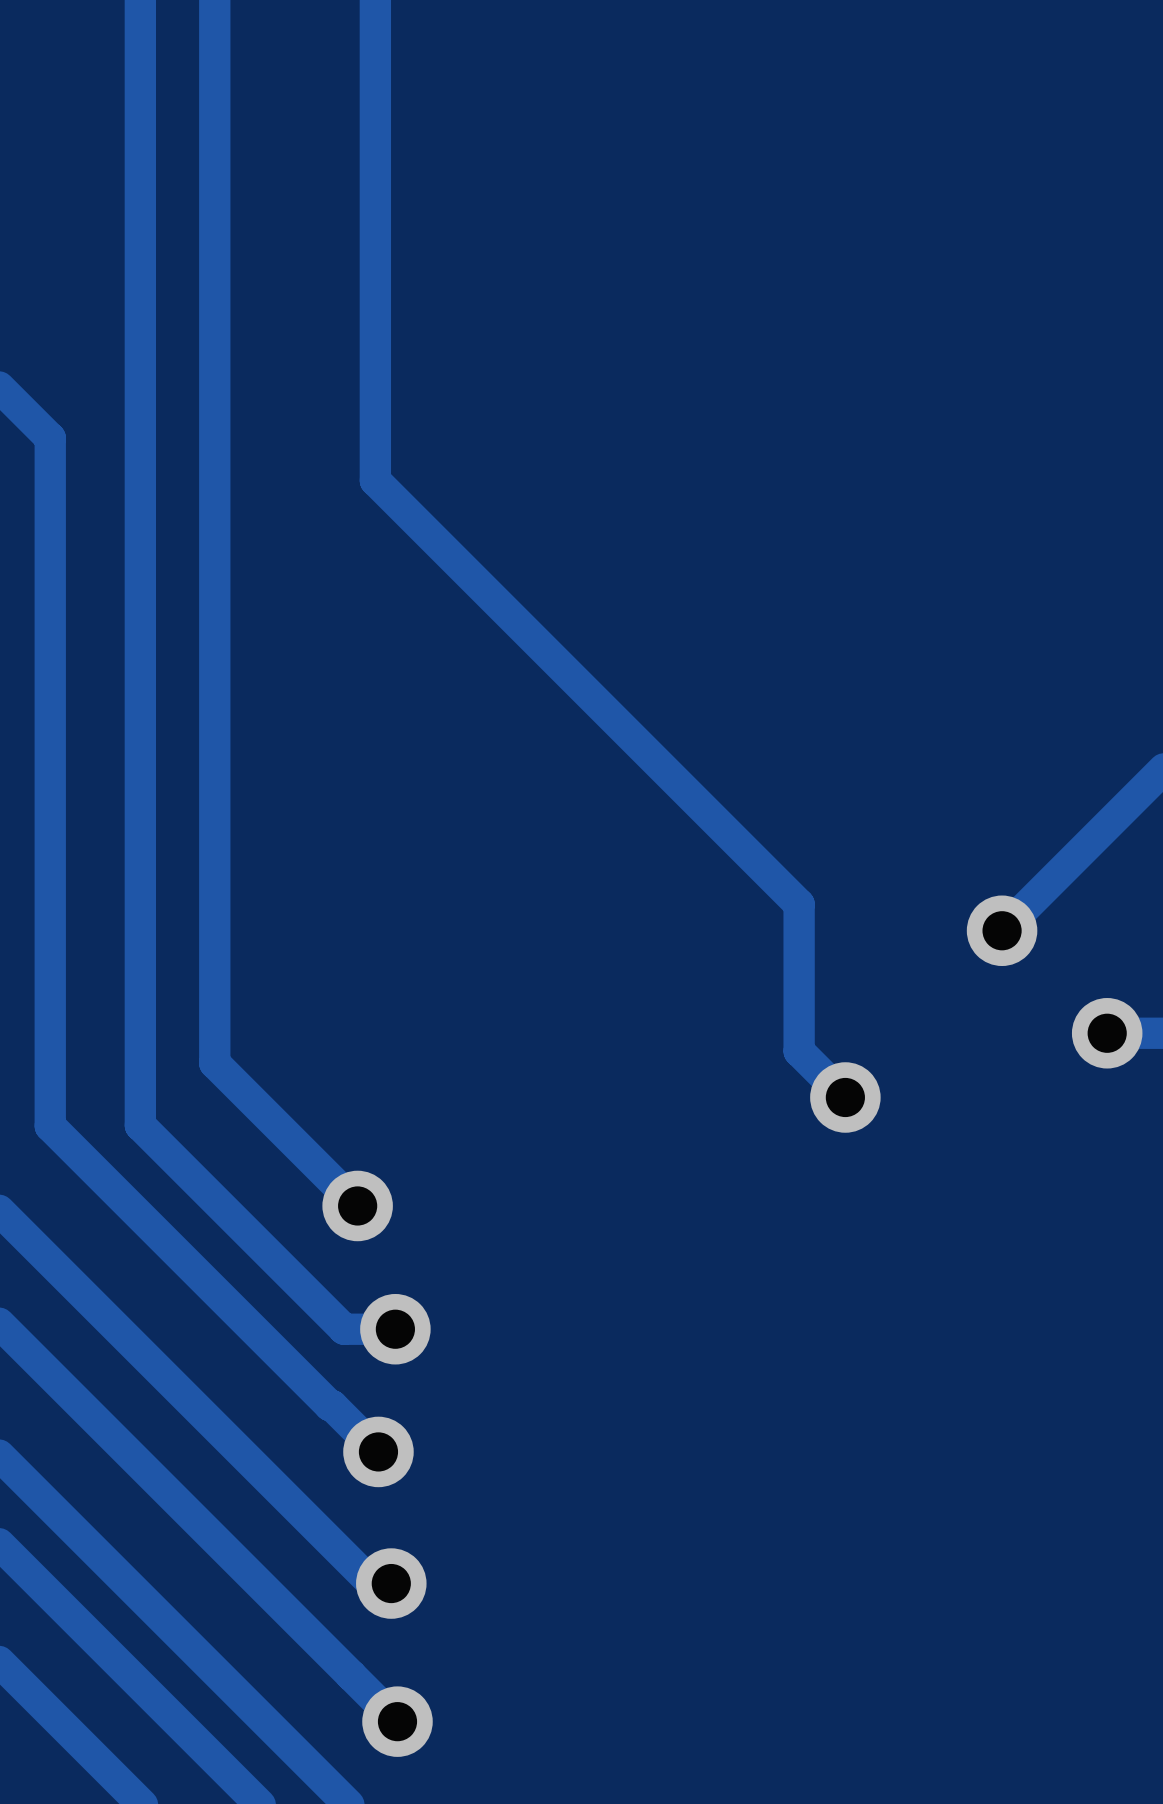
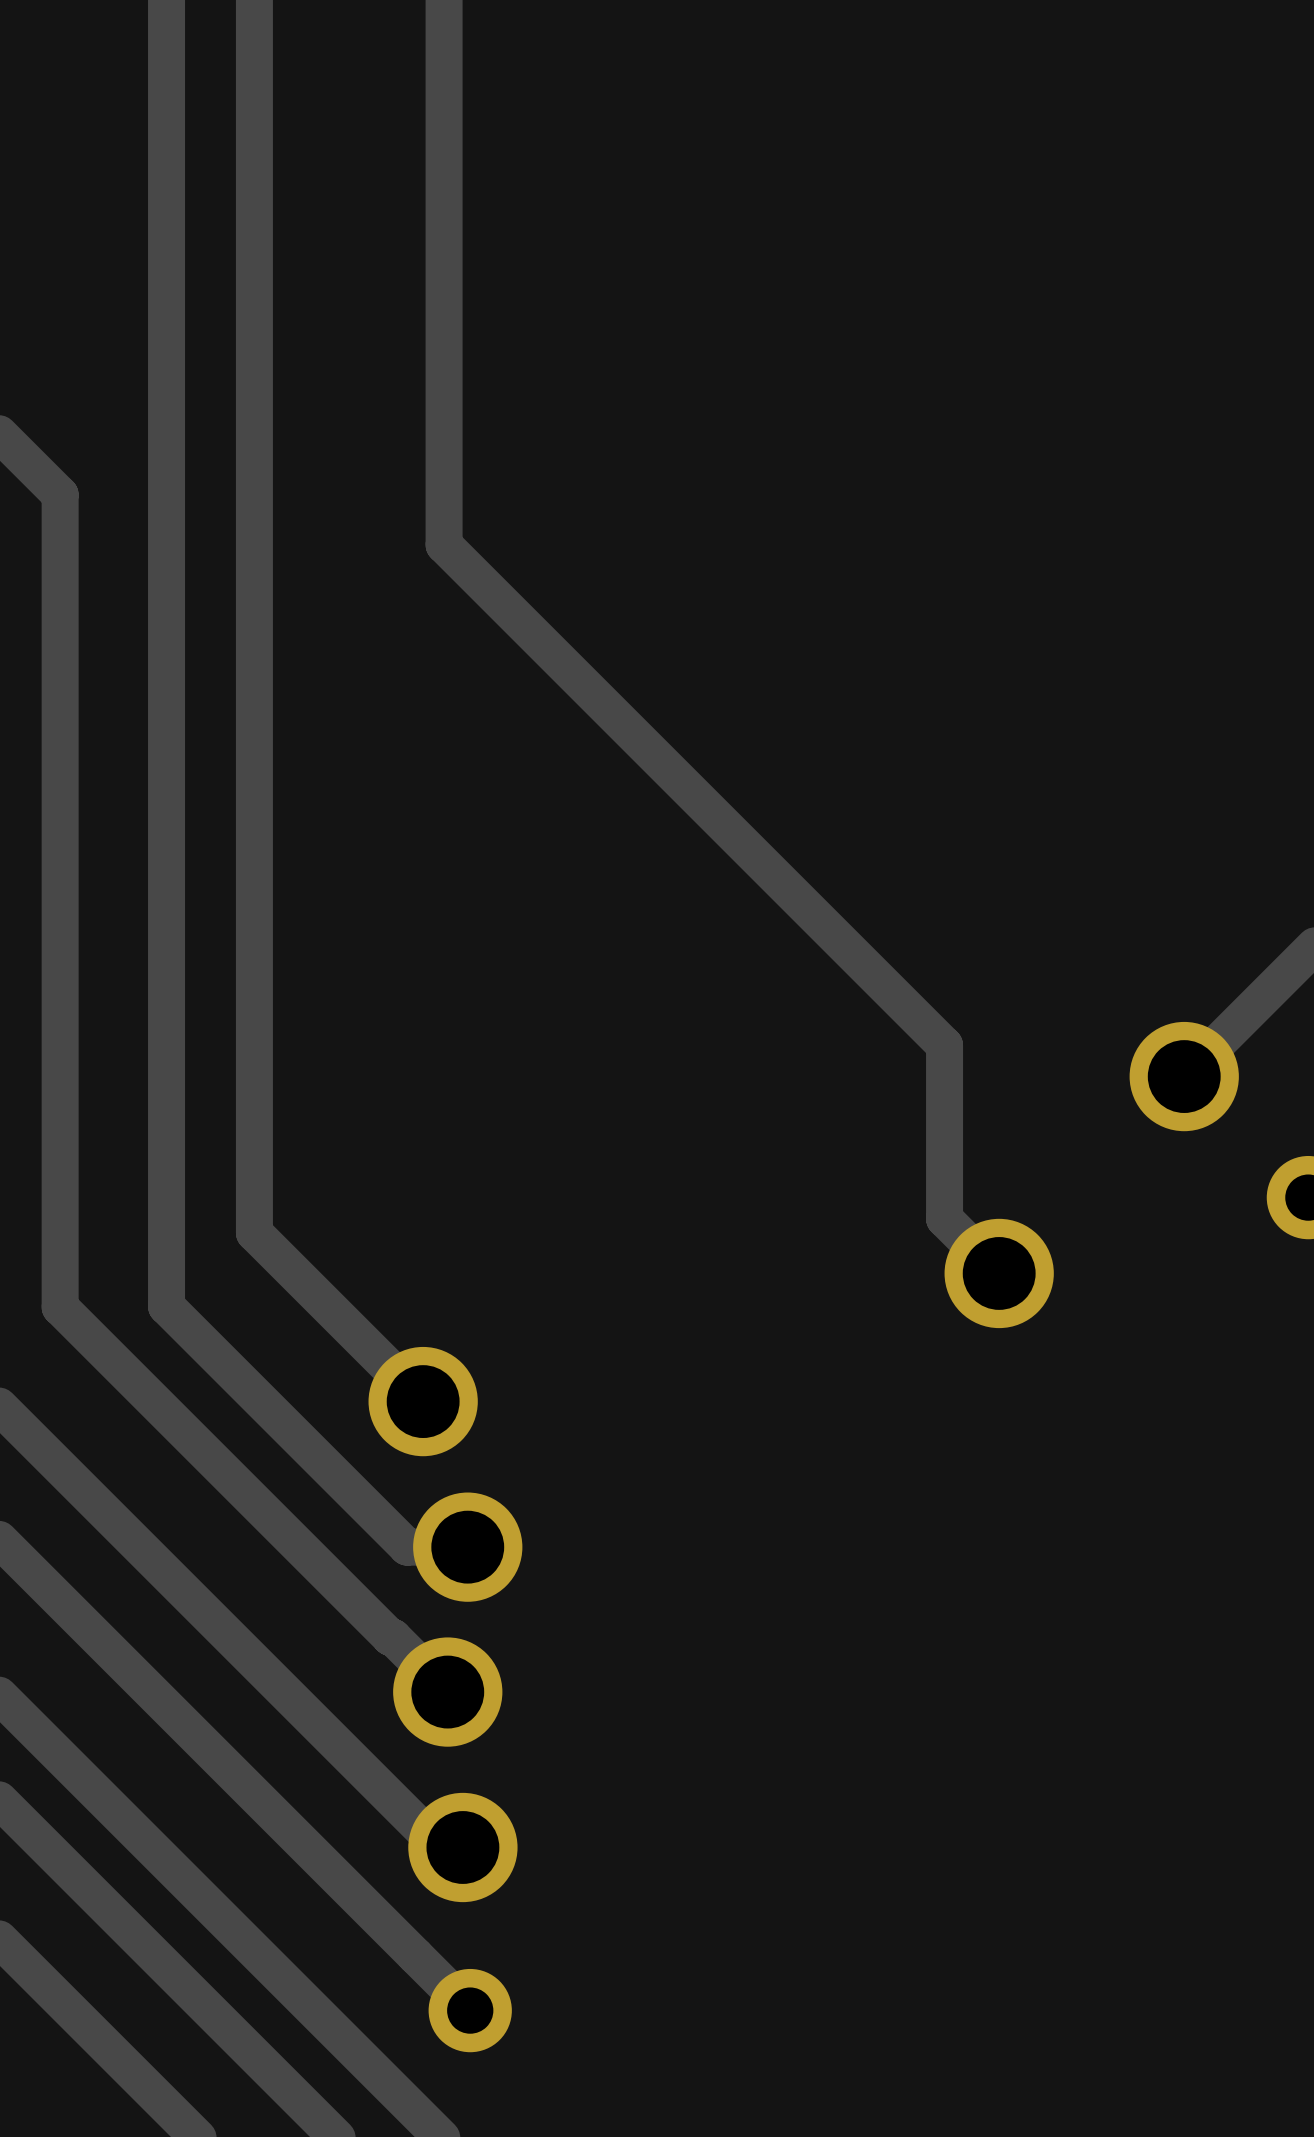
via size: [966, 895, 1038, 967] -> [1129, 1021, 1239, 1132]
via size: [810, 1062, 881, 1133] -> [944, 1218, 1054, 1329]
via size: [322, 1170, 393, 1242] -> [368, 1346, 478, 1457]
via size: [360, 1293, 431, 1365] -> [413, 1492, 523, 1602]
via size: [343, 1416, 414, 1488] -> [393, 1637, 503, 1747]
via size: [356, 1548, 427, 1619] -> [408, 1792, 518, 1903]

